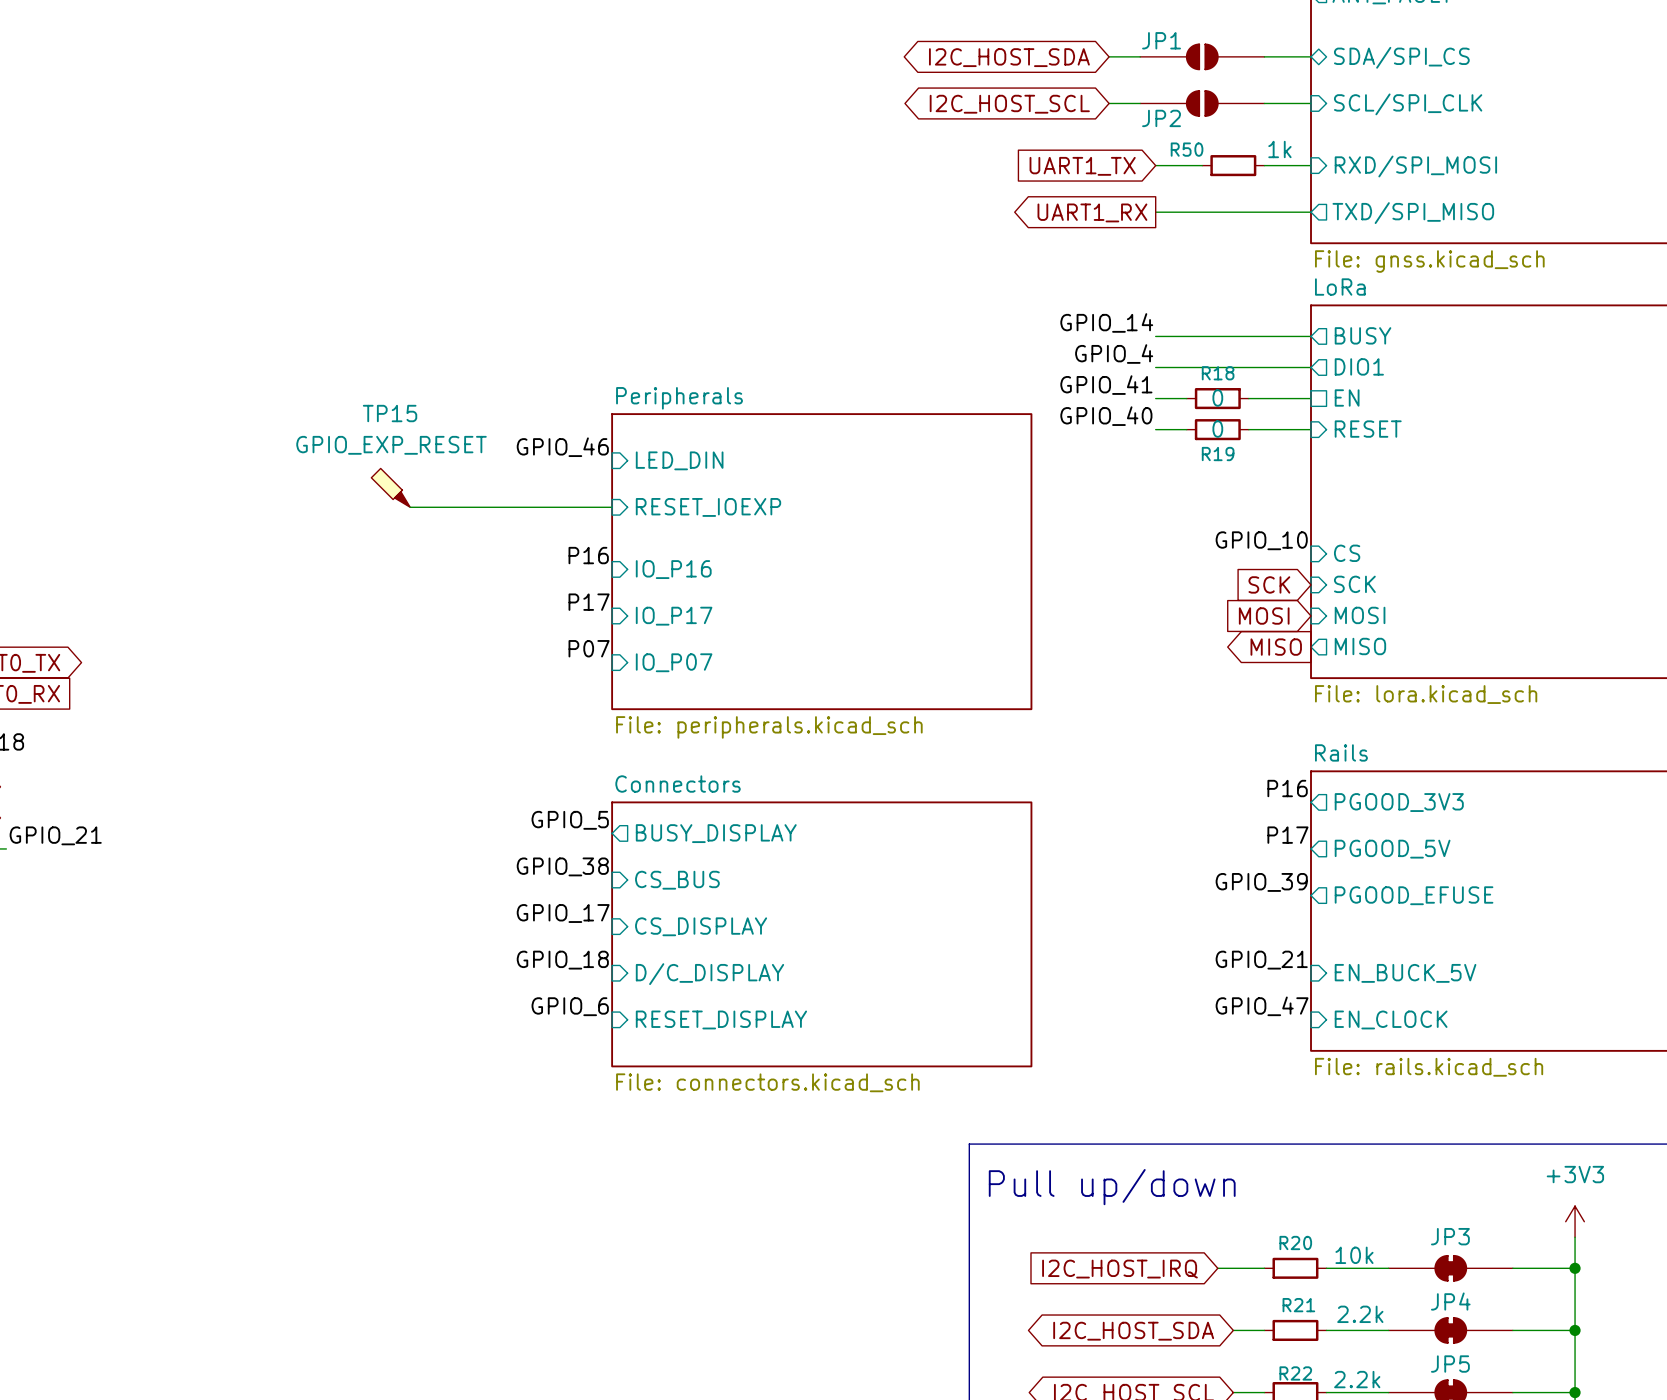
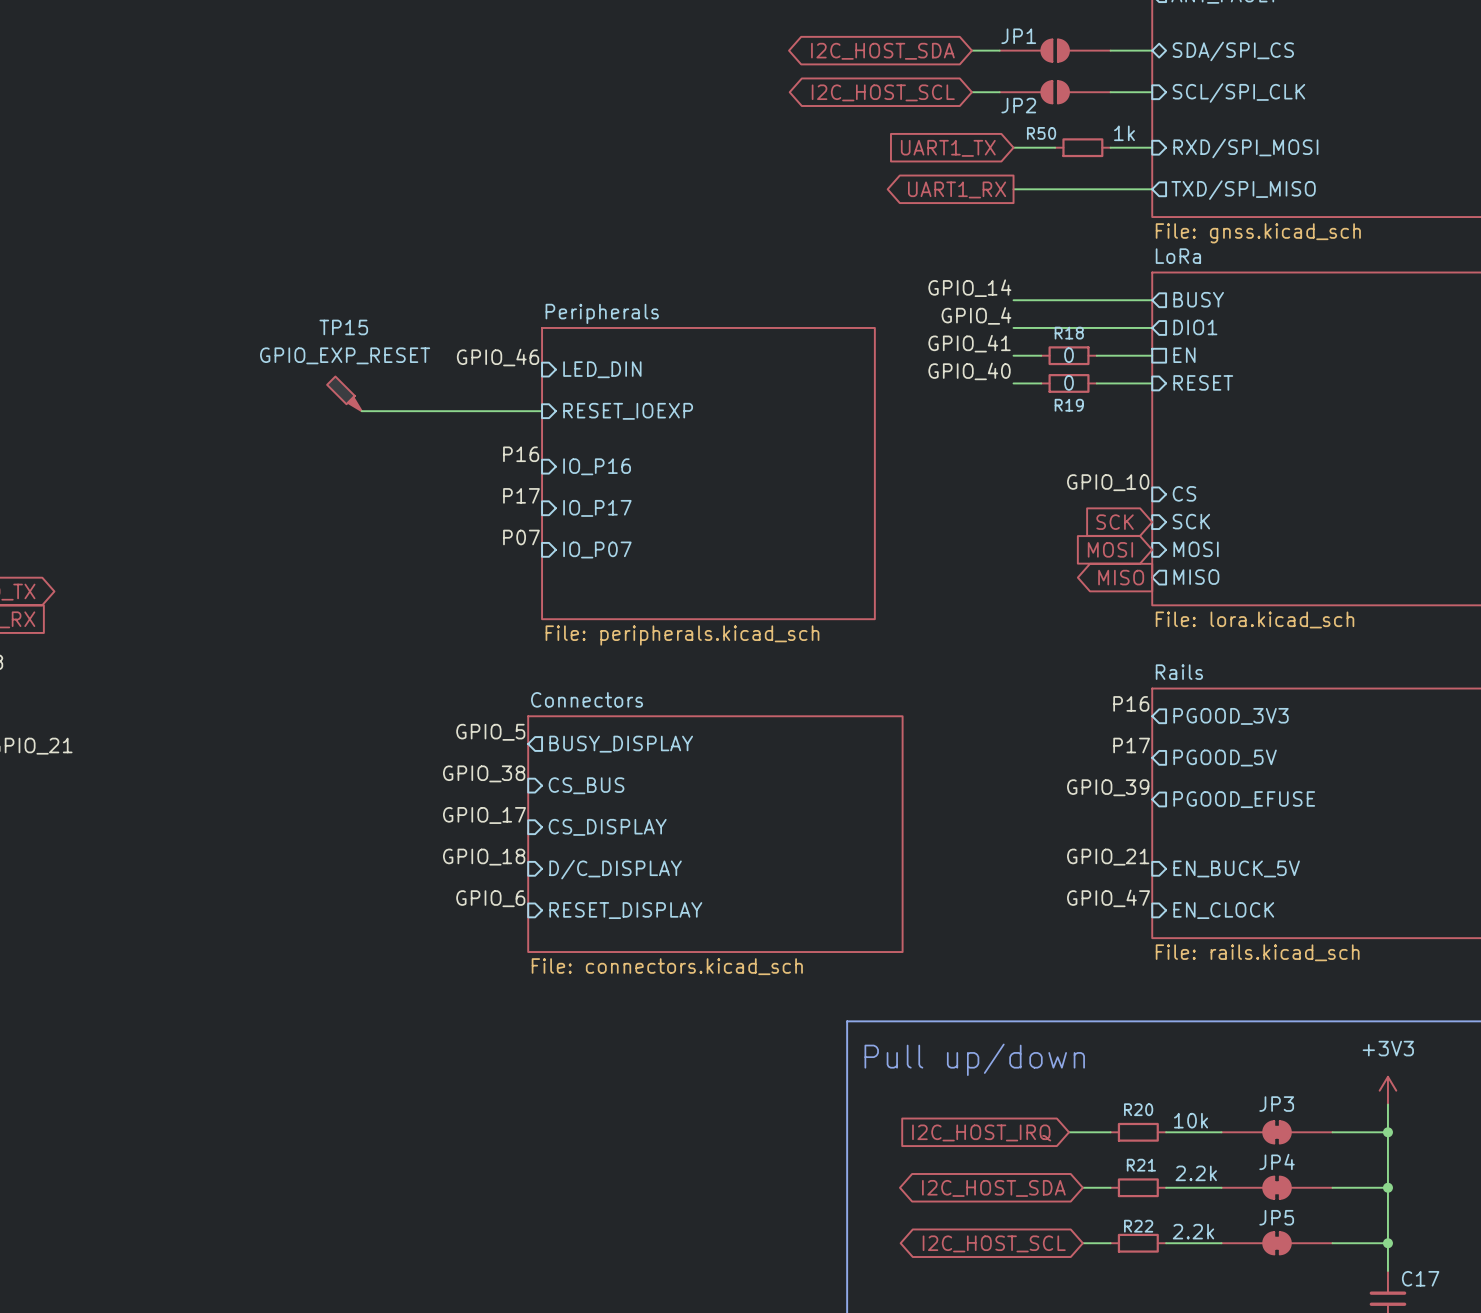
label position: GPIO_46 (562, 447) -> GPIO_46 (498, 357)
sheet pin position: LED_DIN (679, 460) -> LED_DIN (602, 369)
TP15 position: (390, 487) -> (344, 393)
wire: (410, 507) (612, 507) -> (361, 411) (542, 411)
sheet pin position: RESET_IOEXP (708, 507) -> RESET_IOEXP (628, 411)
sheet Peripherals: none -> File: peripherals.kicad_sch (708, 473)
label position: P16 (588, 555) -> P16 (521, 454)
sheet Peripherals: File: peripherals.kicad_sch (821, 561) -> none
sheet pin position: IO_P16 (673, 569) -> IO_P16 (597, 466)
label position: P17 (589, 602) -> P17 (521, 495)
sheet pin position: IO_P17 (674, 616) -> IO_P17 (597, 508)
label position: P07 (589, 648) -> P07 (521, 537)
sheet pin position: IO_P07 (674, 662) -> IO_P07 (597, 550)

